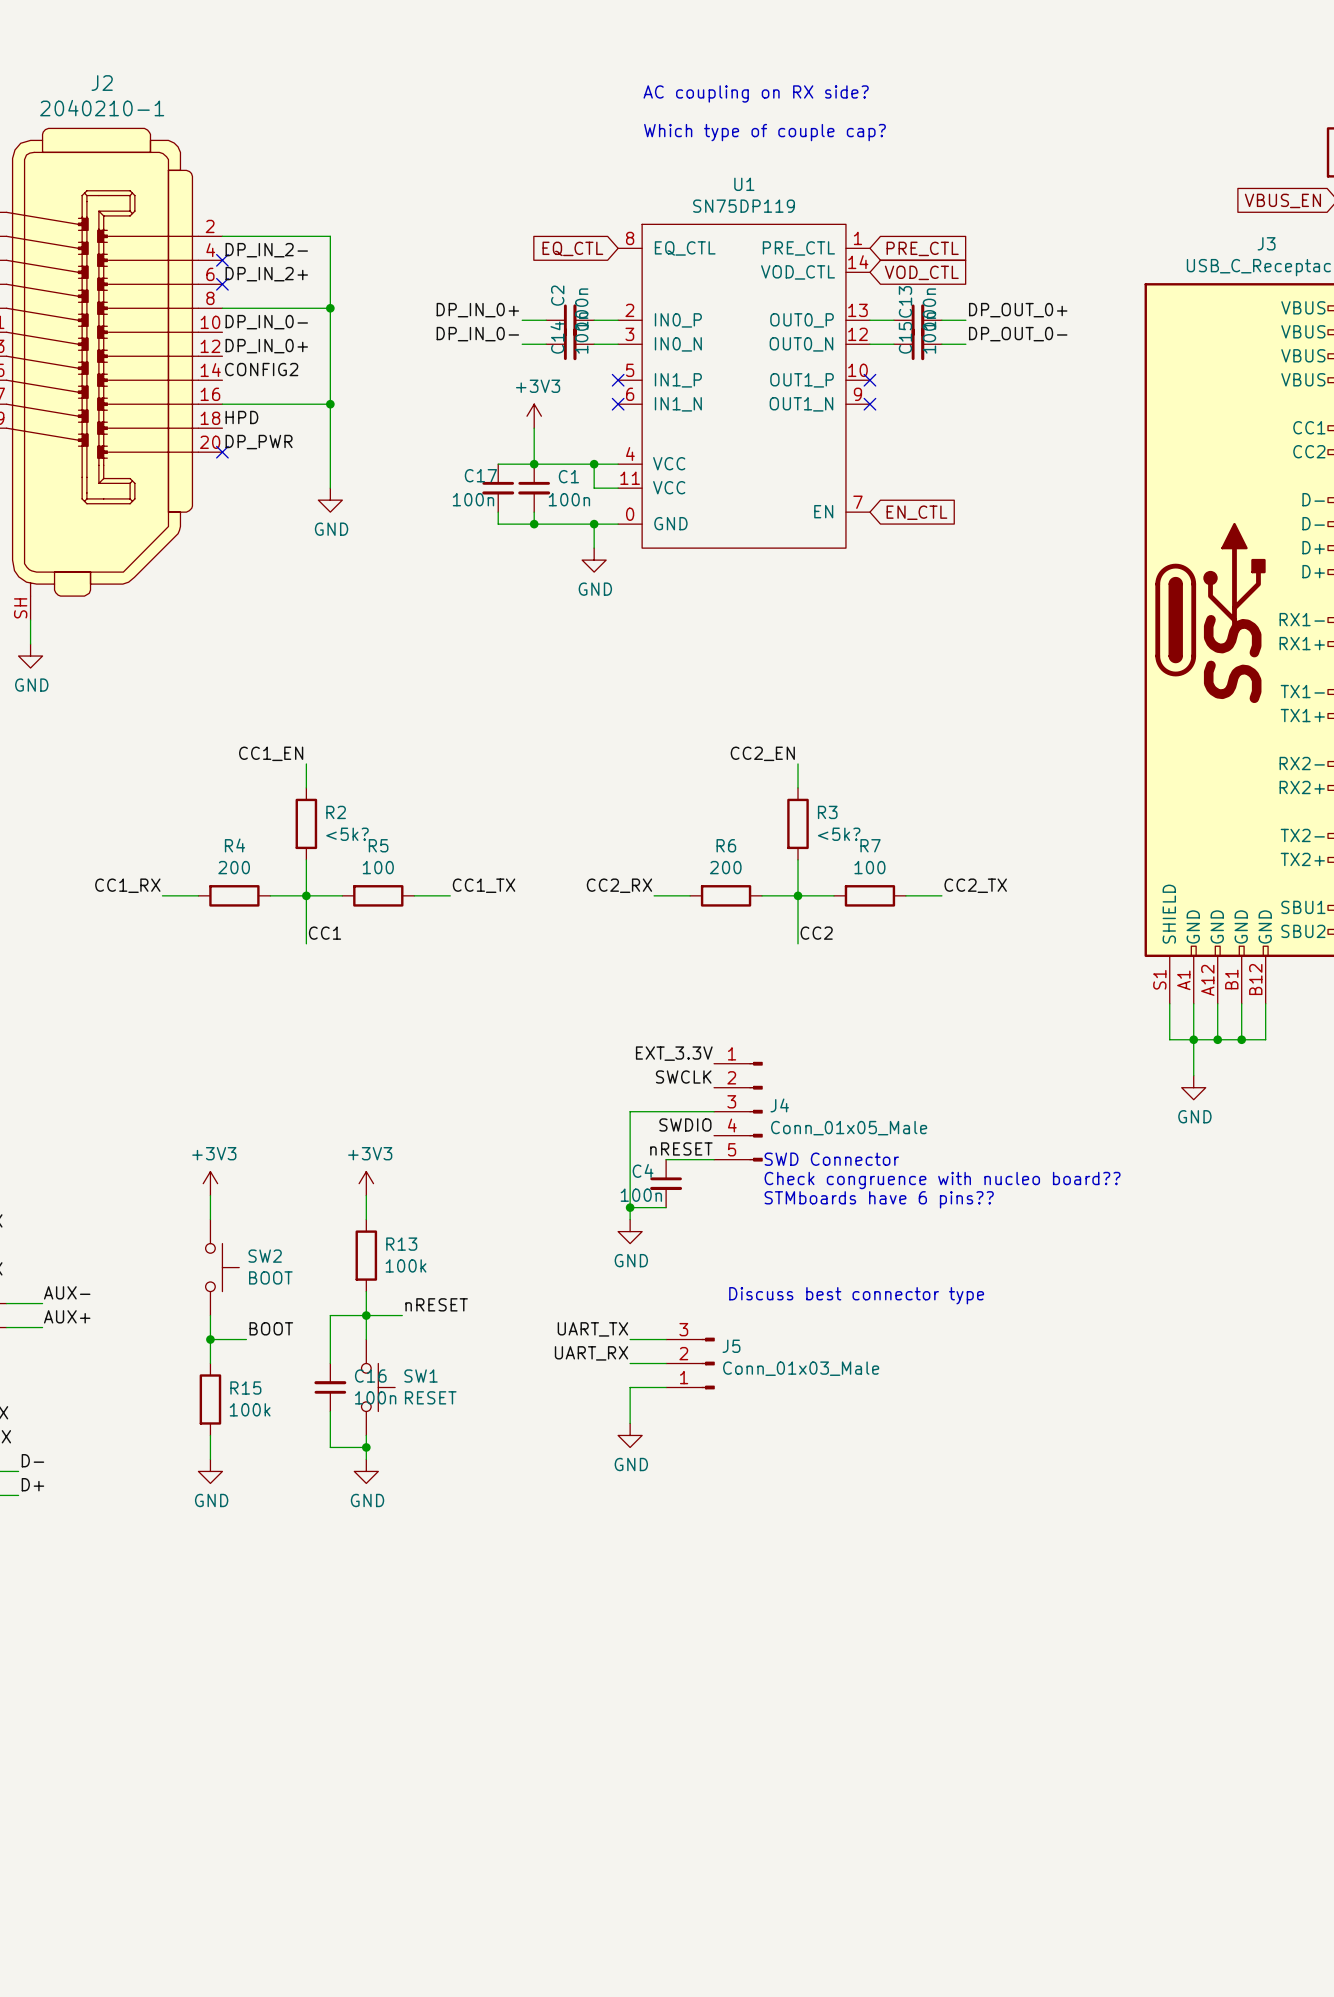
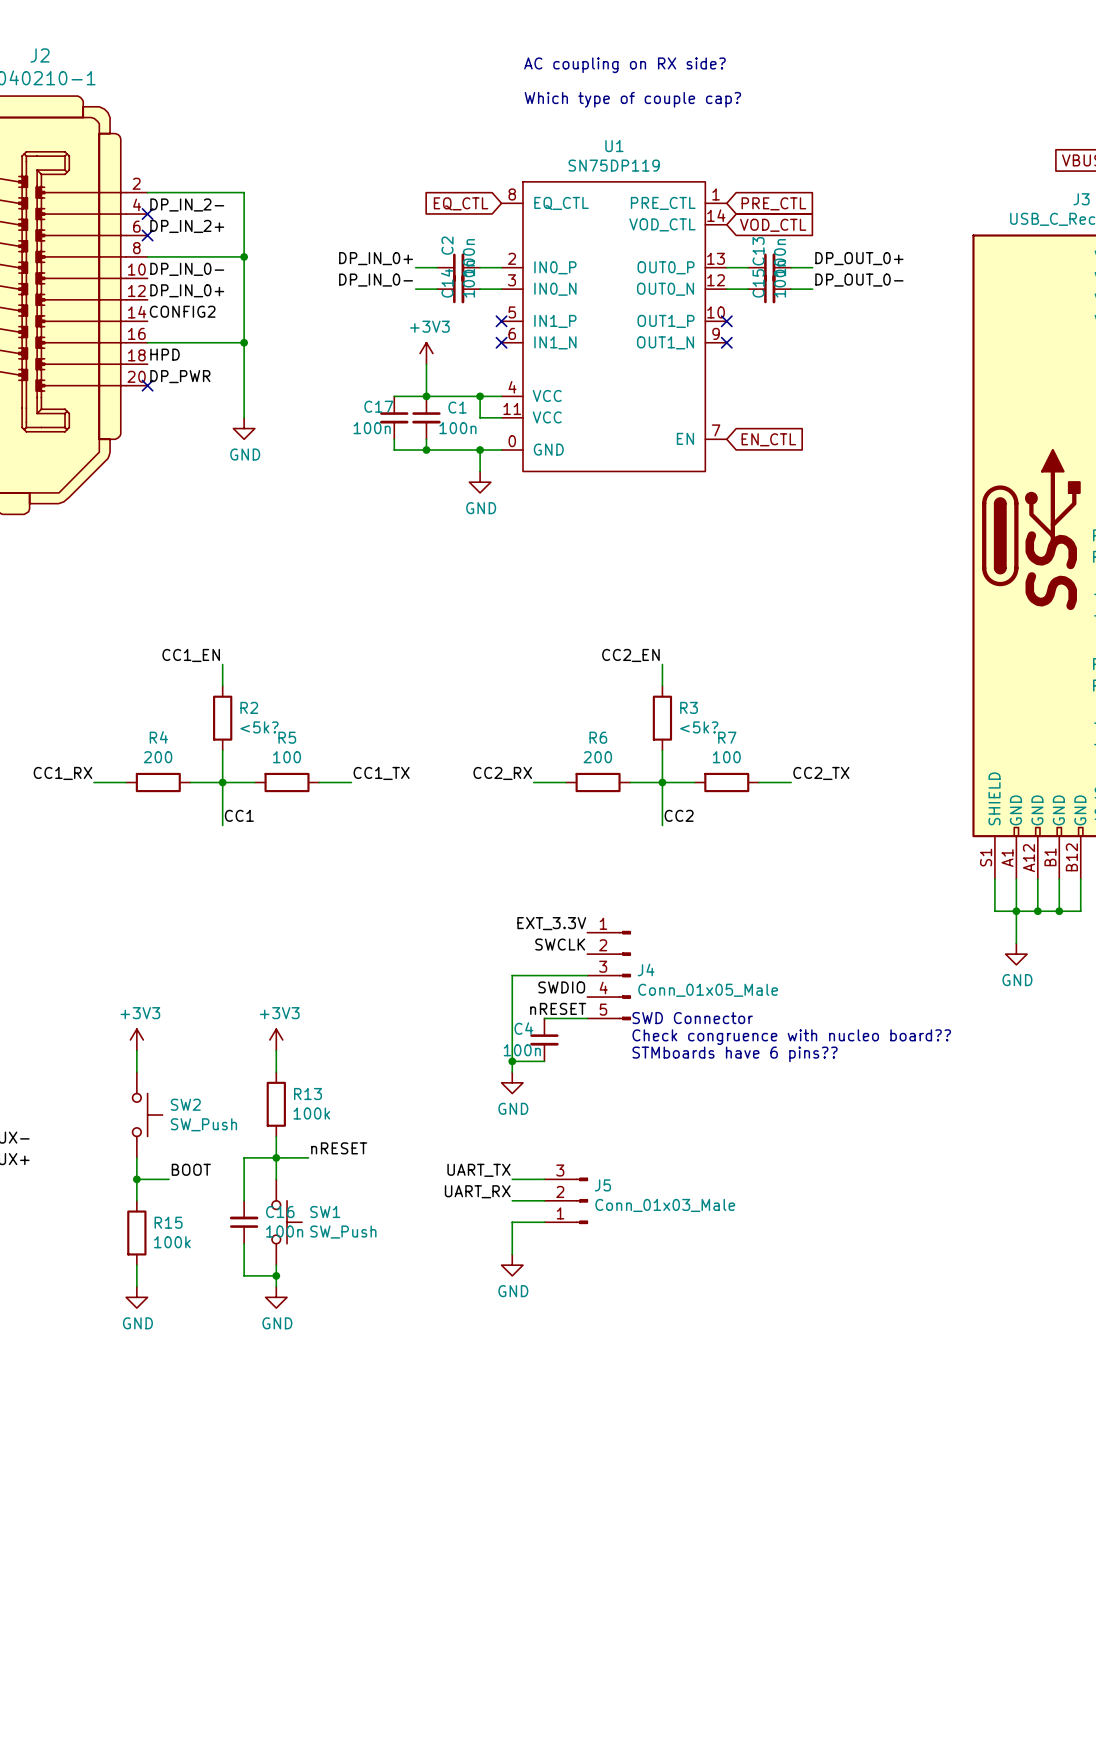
SW2 value: BOOT (270, 1277) -> SW_Push (203, 1124)
text: Discuss best connector type (856, 1295) -> none
SW1 value: RESET (430, 1397) -> SW_Push (343, 1232)

